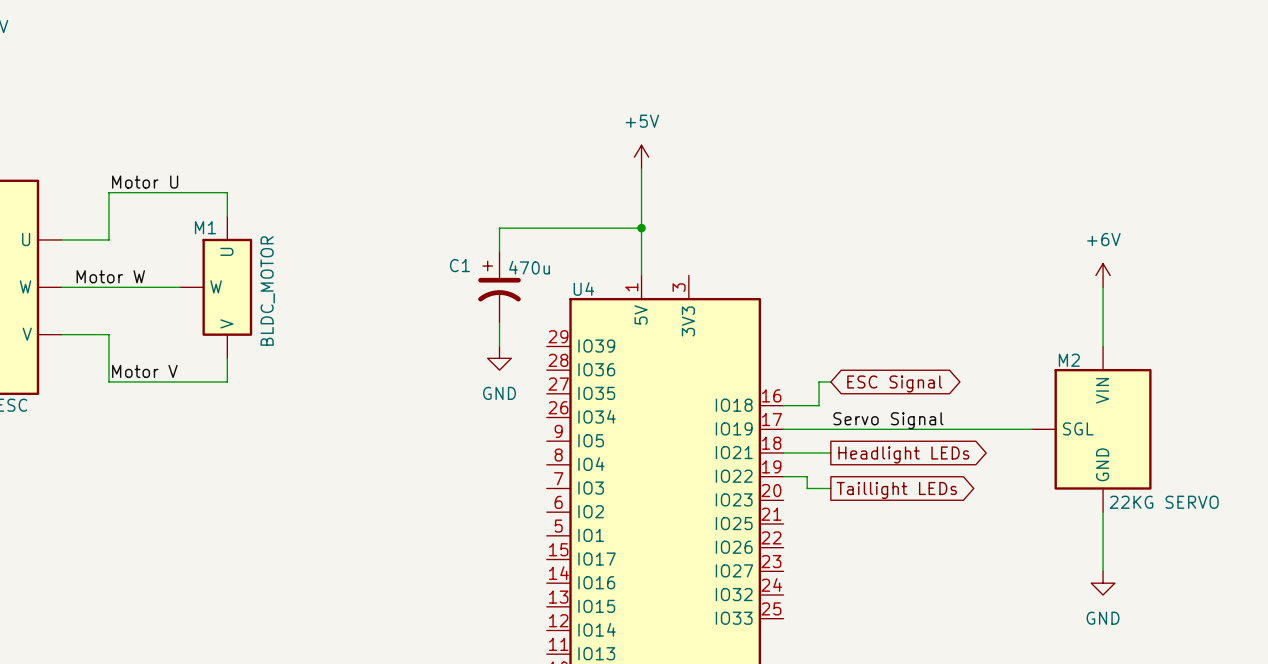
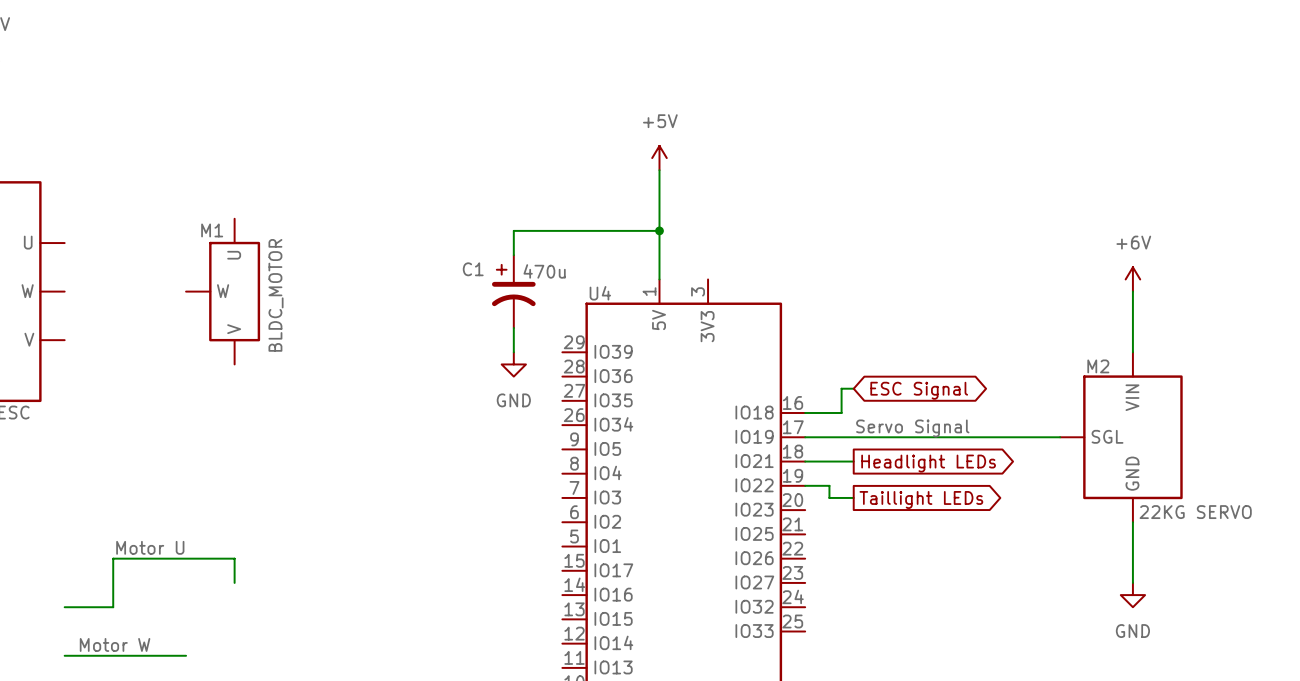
label: Motor U (145, 182) -> none
wire: (227, 216) (227, 192) (109, 192) (109, 239) (61, 239) -> none
label: Motor W (110, 276) -> none
wire: (61, 287) (180, 287) -> none
wire: (61, 334) (109, 334) (109, 381) (227, 381) (227, 358) -> none
label: Motor V (144, 371) -> none
label: none -> Motor U (150, 547)
wire: none -> (234, 582) (234, 558) (113, 558) (113, 607) (64, 607)
label: none -> Motor W (115, 644)
wire: none -> (64, 655) (186, 655)

